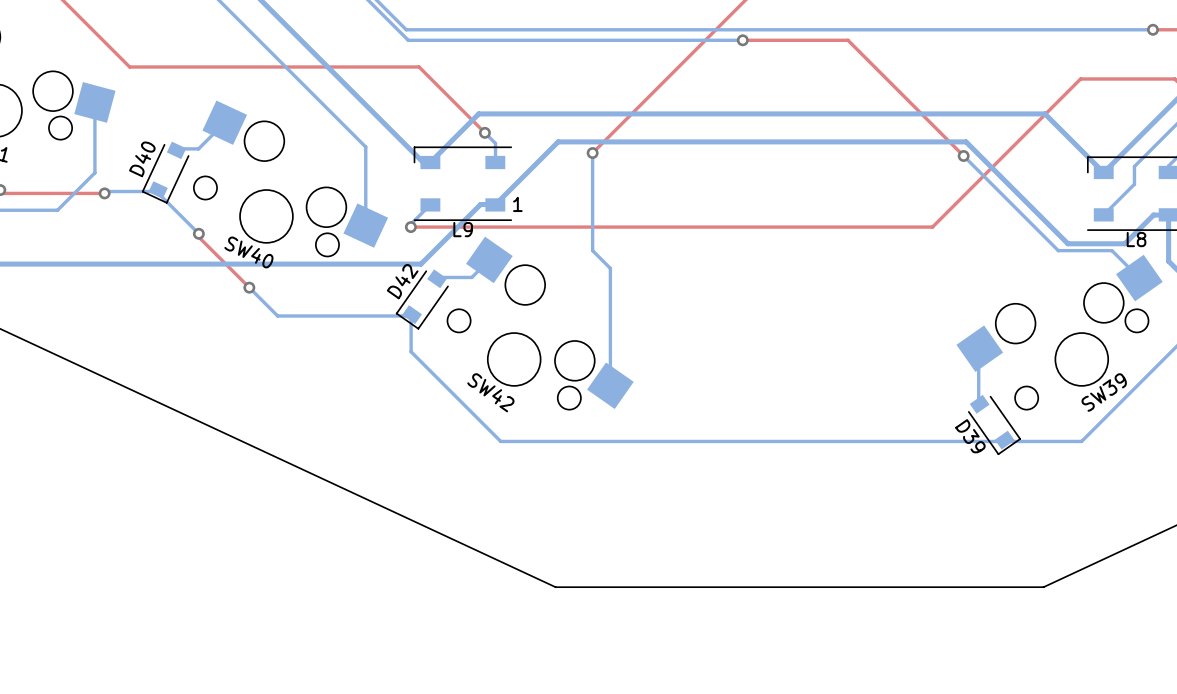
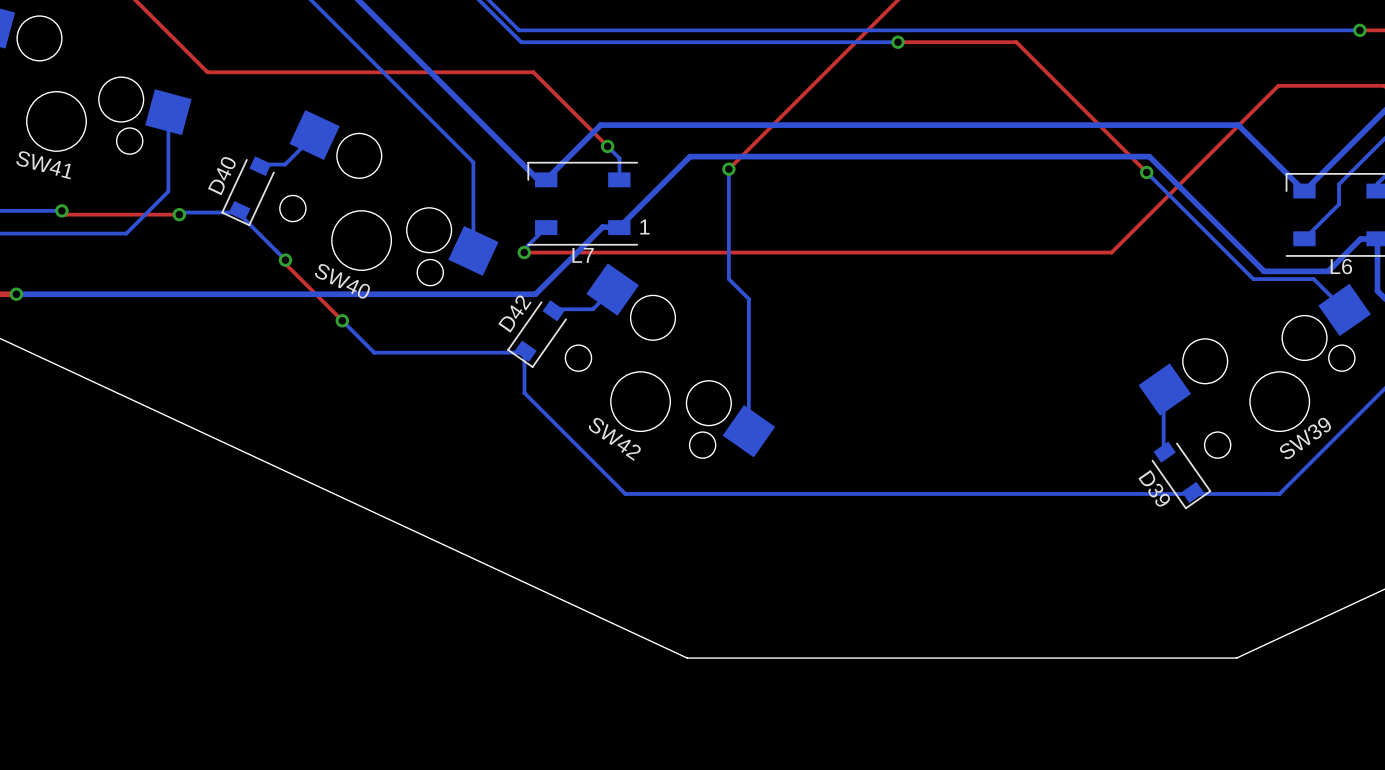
L9 name: L9 (463, 229) -> L7 (583, 255)
L8 name: L8 (1136, 239) -> L6 (1341, 266)

